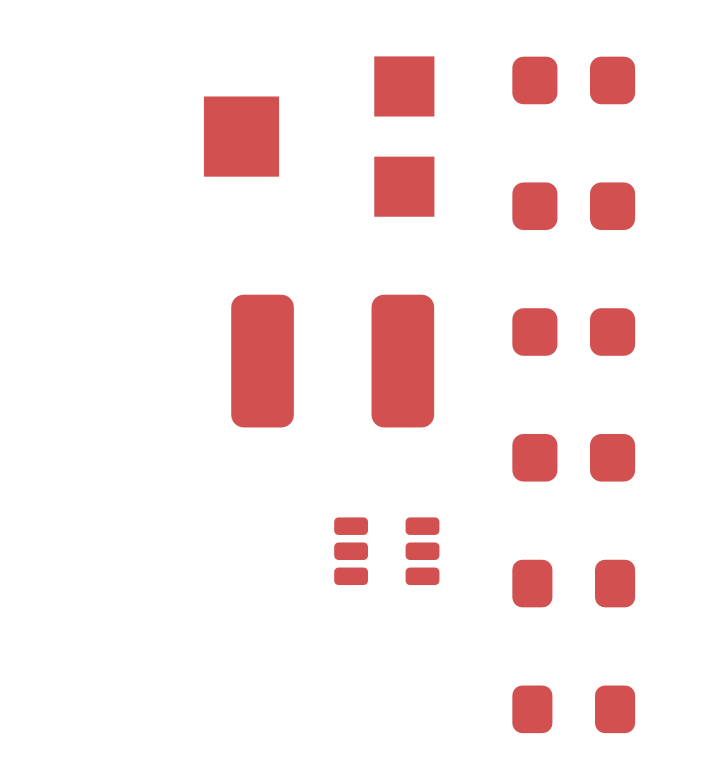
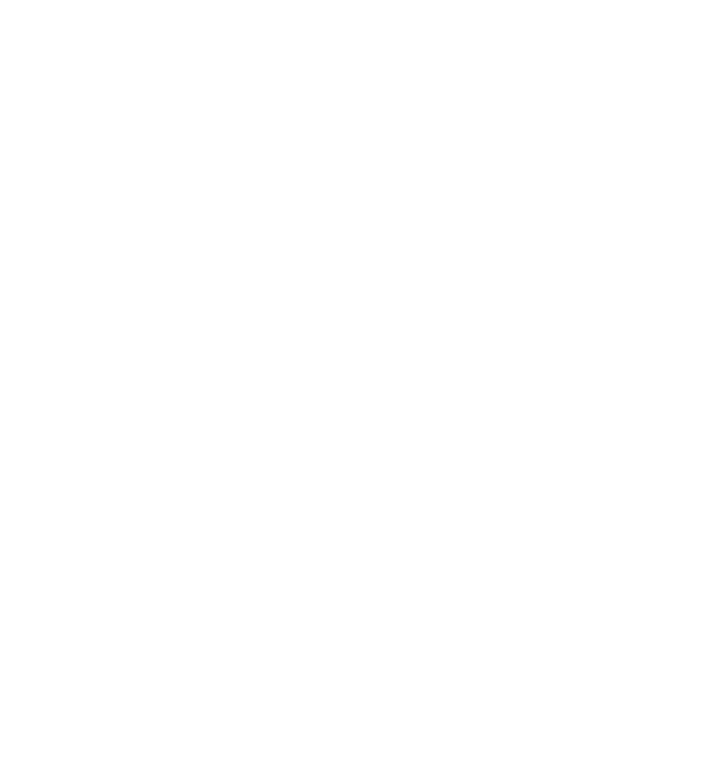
part: (573, 80) -> none
part: (319, 136) -> none
part: (573, 206) -> none
part: (573, 332) -> none
part: (332, 361) -> none
part: (573, 457) -> none
part: (386, 551) -> none
part: (573, 583) -> none
part: (573, 709) -> none

